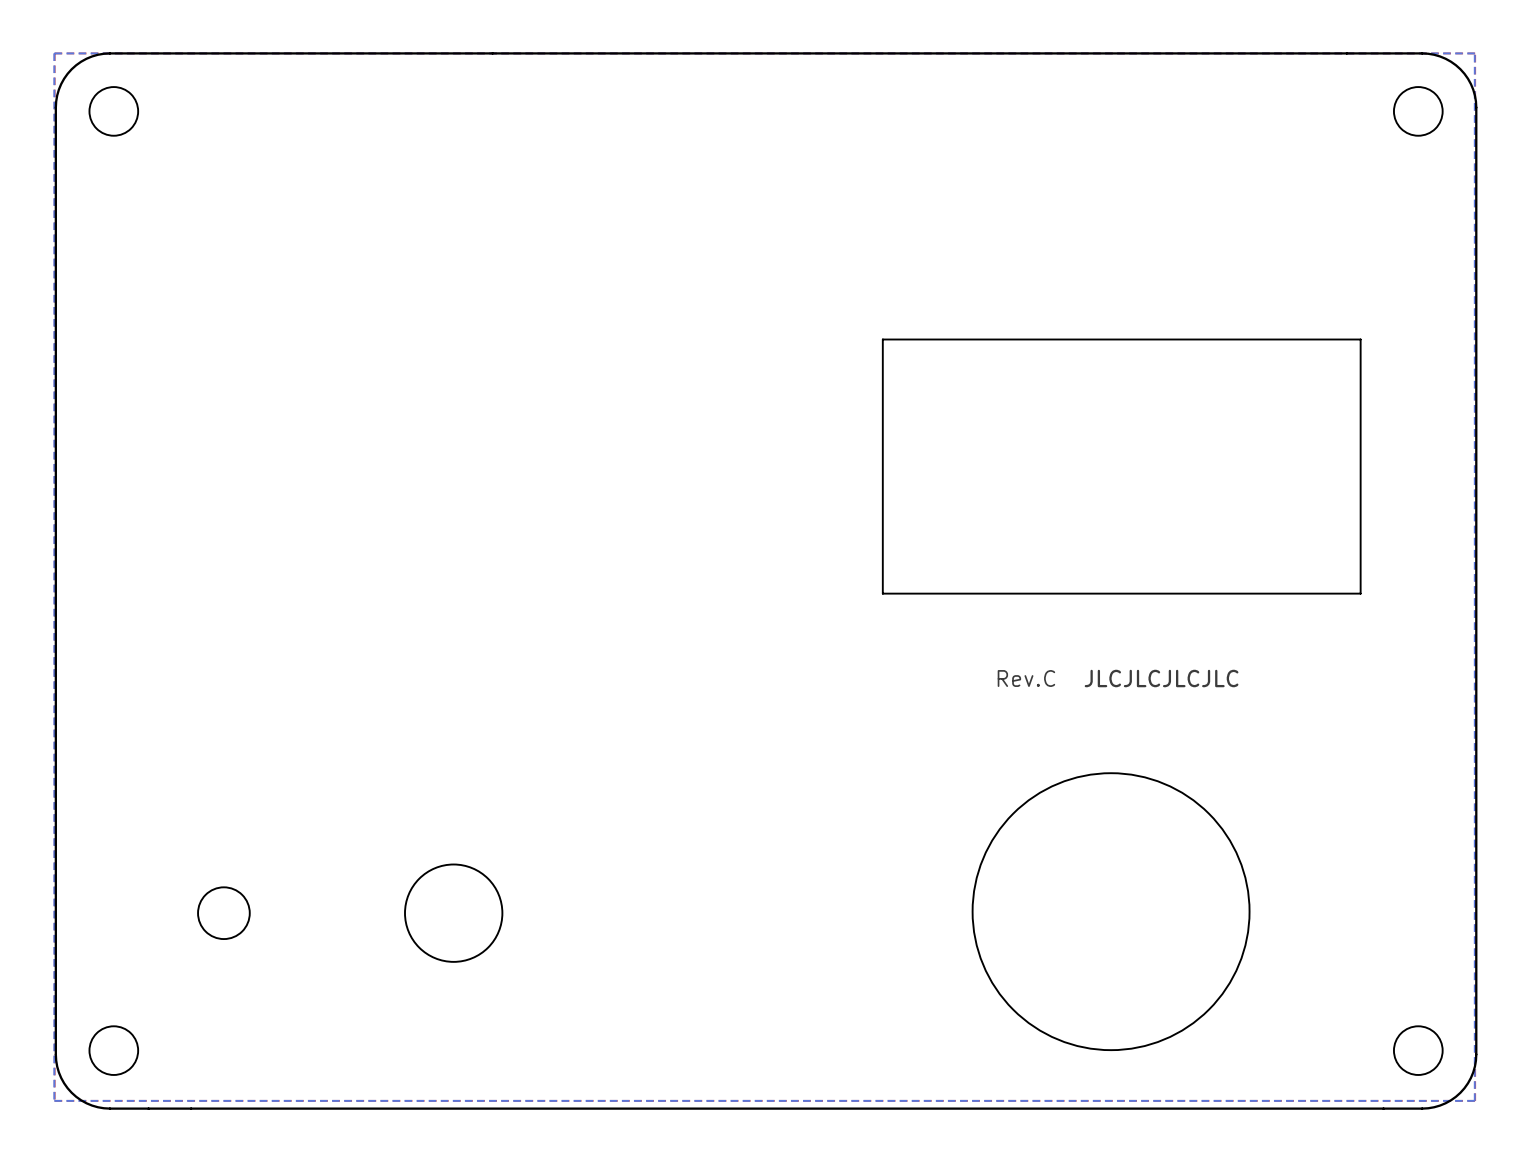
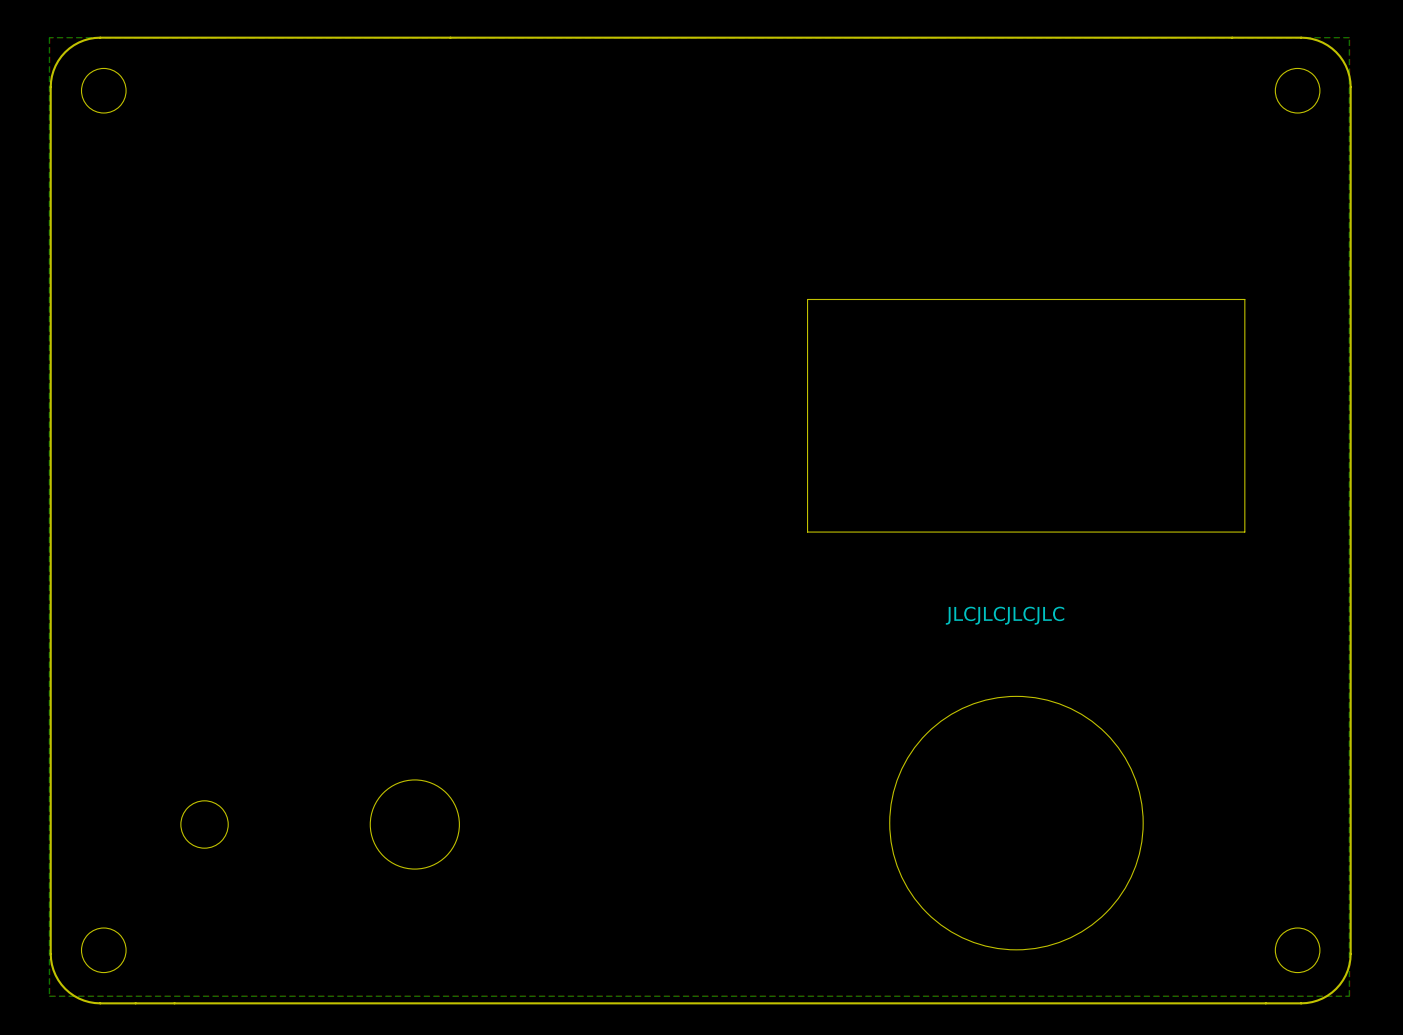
text: Rev.C (1026, 678) -> none
text position: JLCJLCJLCJLC (1161, 678) -> JLCJLCJLCJLC (1005, 615)

